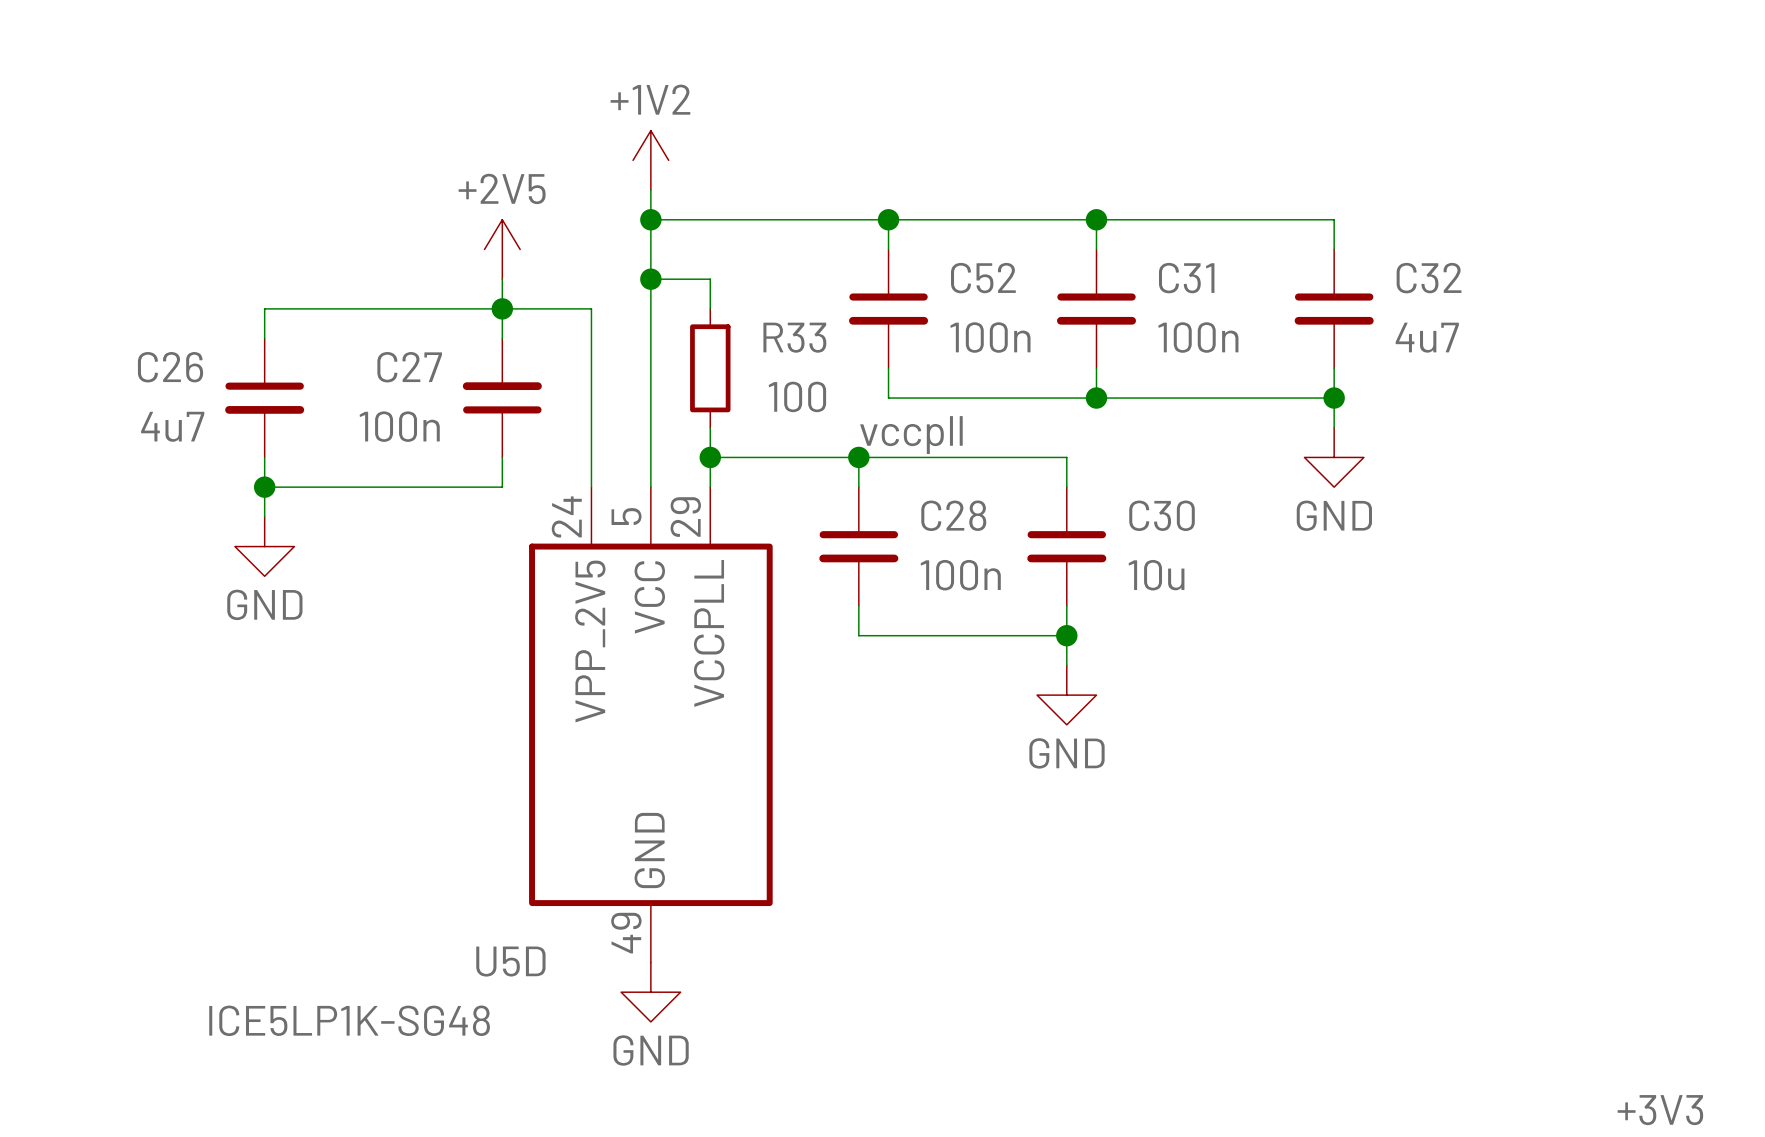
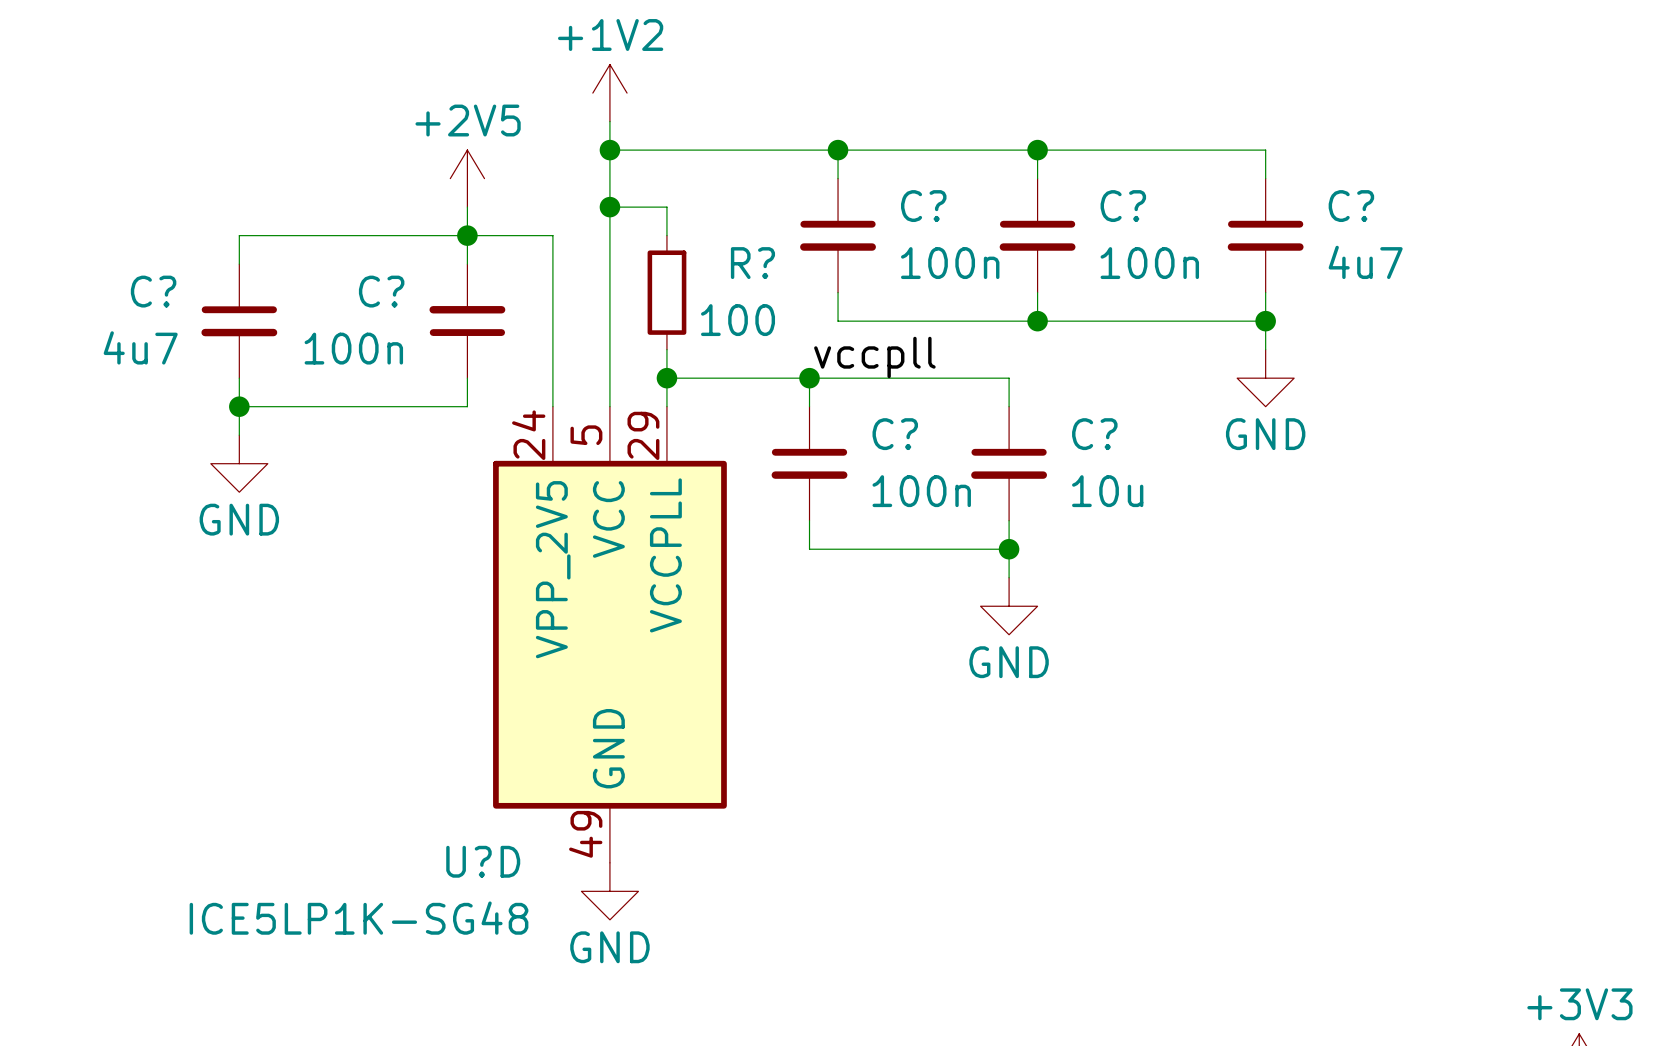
C52 name: C52 (983, 278) -> C? (923, 206)
C31 name: C31 (1186, 278) -> C? (1123, 206)
C32 name: C32 (1429, 278) -> C? (1351, 206)
R33 name: R33 (794, 337) -> R? (752, 263)
C26 name: C26 (170, 367) -> C? (153, 291)
C27 name: C27 (409, 367) -> C? (381, 291)
C28 name: C28 (953, 515) -> C? (895, 434)
C30 name: C30 (1162, 515) -> C? (1094, 434)
U5D name: U5D (510, 961) -> U?D (483, 861)

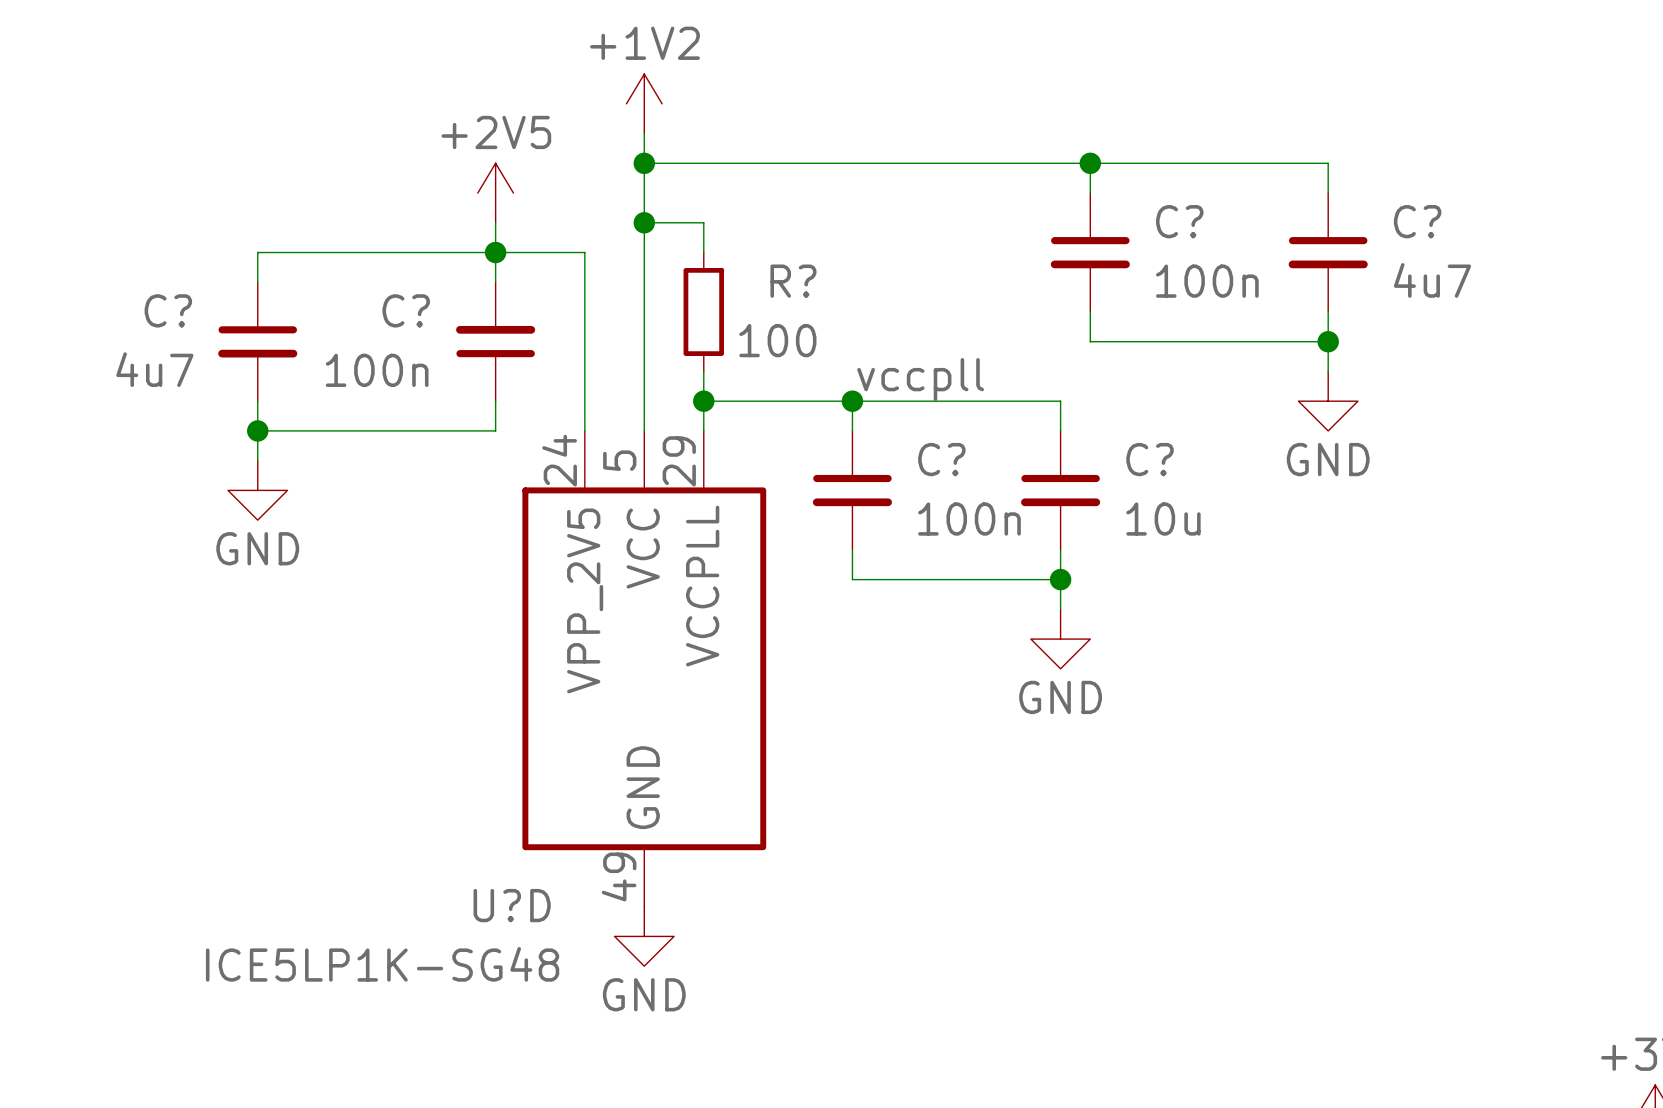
wire: (838, 150) (838, 178) -> none
junction: (838, 150) -> none
C?: 100n (838, 235) -> none
wire: (838, 292) (838, 321) (1037, 321) -> none
junction: (1037, 321) -> none

